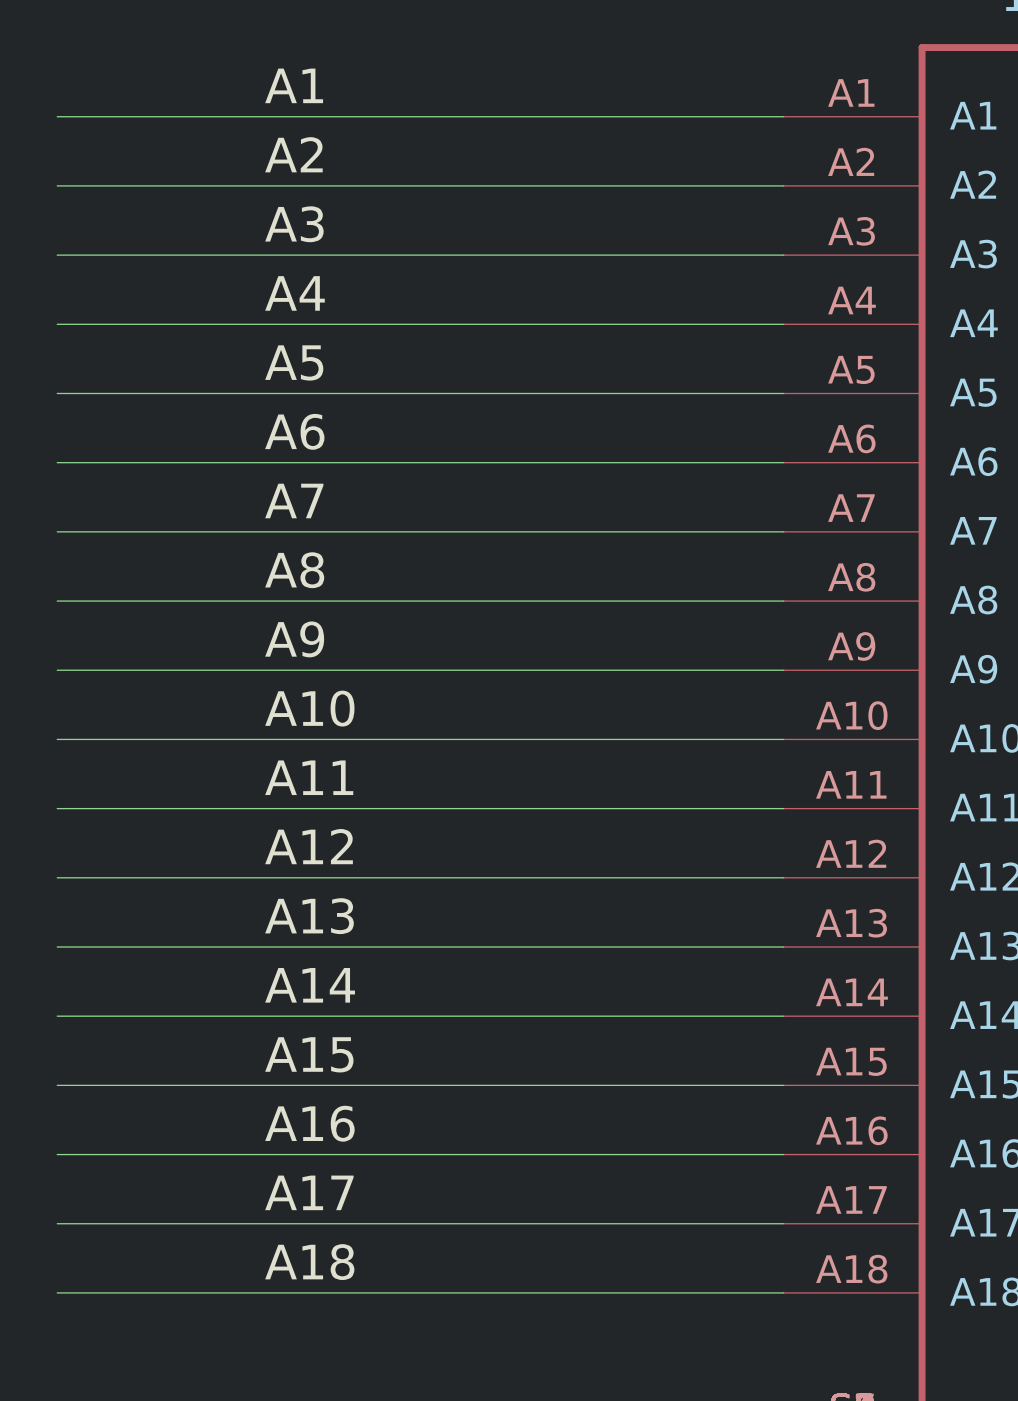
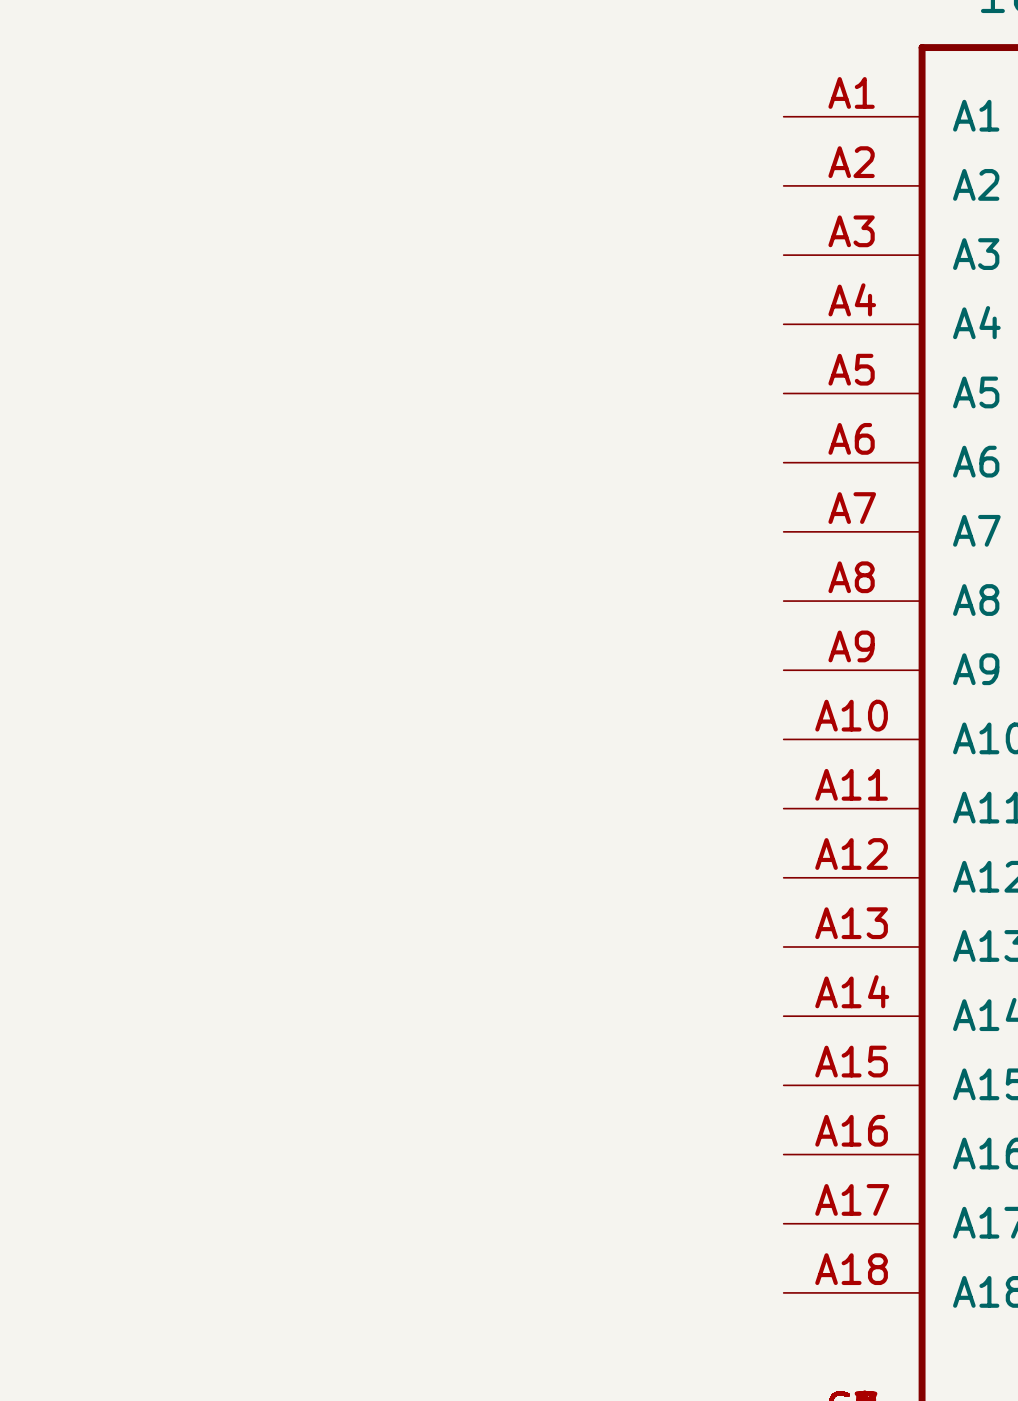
label: A1 (294, 85) -> none
wire: (57, 116) (783, 116) -> none
label: A2 (293, 154) -> none
wire: (57, 185) (783, 185) -> none
label: A3 (294, 224) -> none
wire: (57, 255) (783, 255) -> none
label: A4 (294, 293) -> none
wire: (57, 324) (783, 324) -> none
label: A5 (294, 362) -> none
wire: (57, 393) (783, 393) -> none
label: A6 (294, 431) -> none
wire: (57, 462) (783, 462) -> none
label: A7 (294, 501) -> none
wire: (57, 531) (783, 531) -> none
label: A8 (294, 570) -> none
wire: (57, 601) (783, 601) -> none
label: A9 (294, 639) -> none
wire: (57, 670) (783, 670) -> none
label: A10 (309, 708) -> none
wire: (57, 739) (783, 739) -> none
label: A11 (309, 777) -> none
wire: (57, 808) (783, 808) -> none
label: A12 (309, 846) -> none
wire: (57, 877) (783, 877) -> none
label: A13 (309, 916) -> none
wire: (57, 946) (783, 946) -> none
label: A14 (310, 985) -> none
wire: (57, 1016) (783, 1016) -> none
label: A15 (309, 1054) -> none
wire: (57, 1085) (783, 1085) -> none
label: A16 (309, 1123) -> none
wire: (57, 1154) (783, 1154) -> none
label: A17 (309, 1192) -> none
wire: (57, 1223) (783, 1223) -> none
label: A18 (309, 1262) -> none
wire: (57, 1292) (783, 1292) -> none

